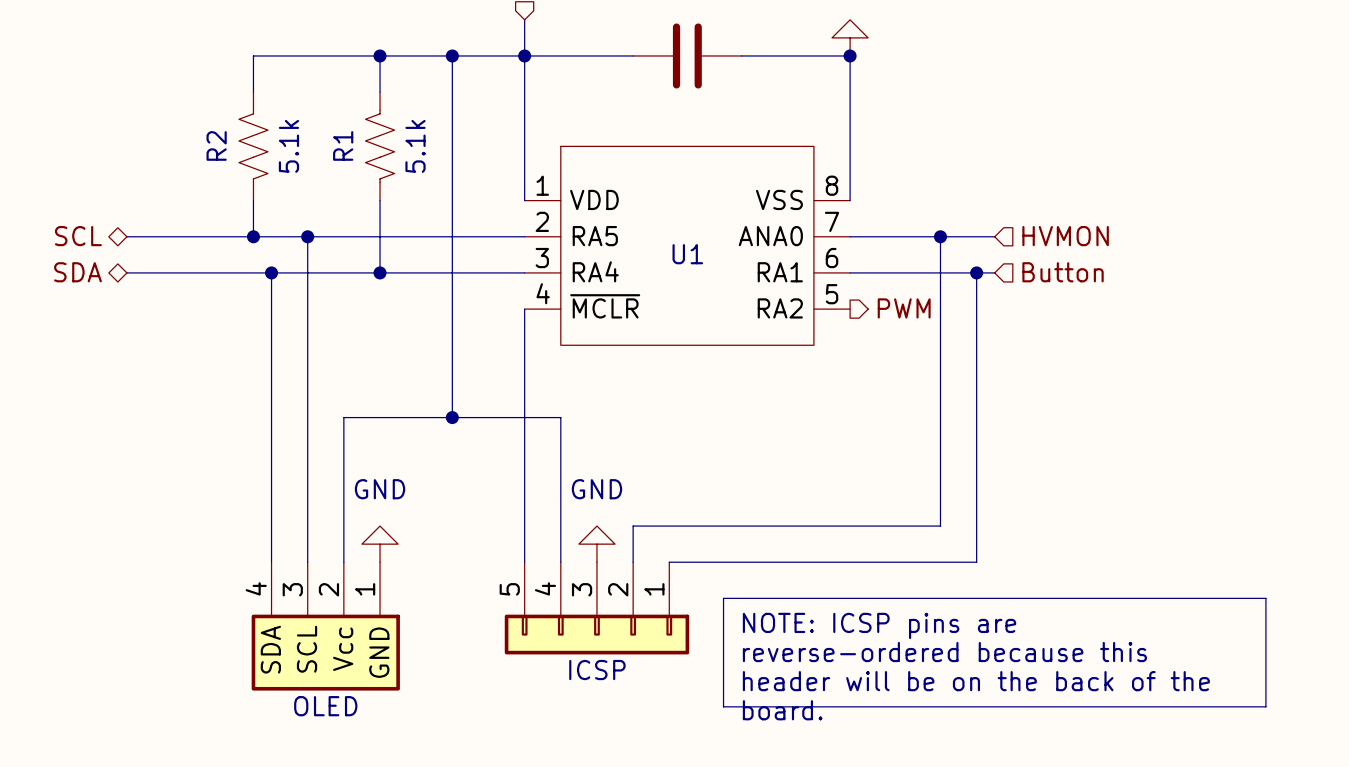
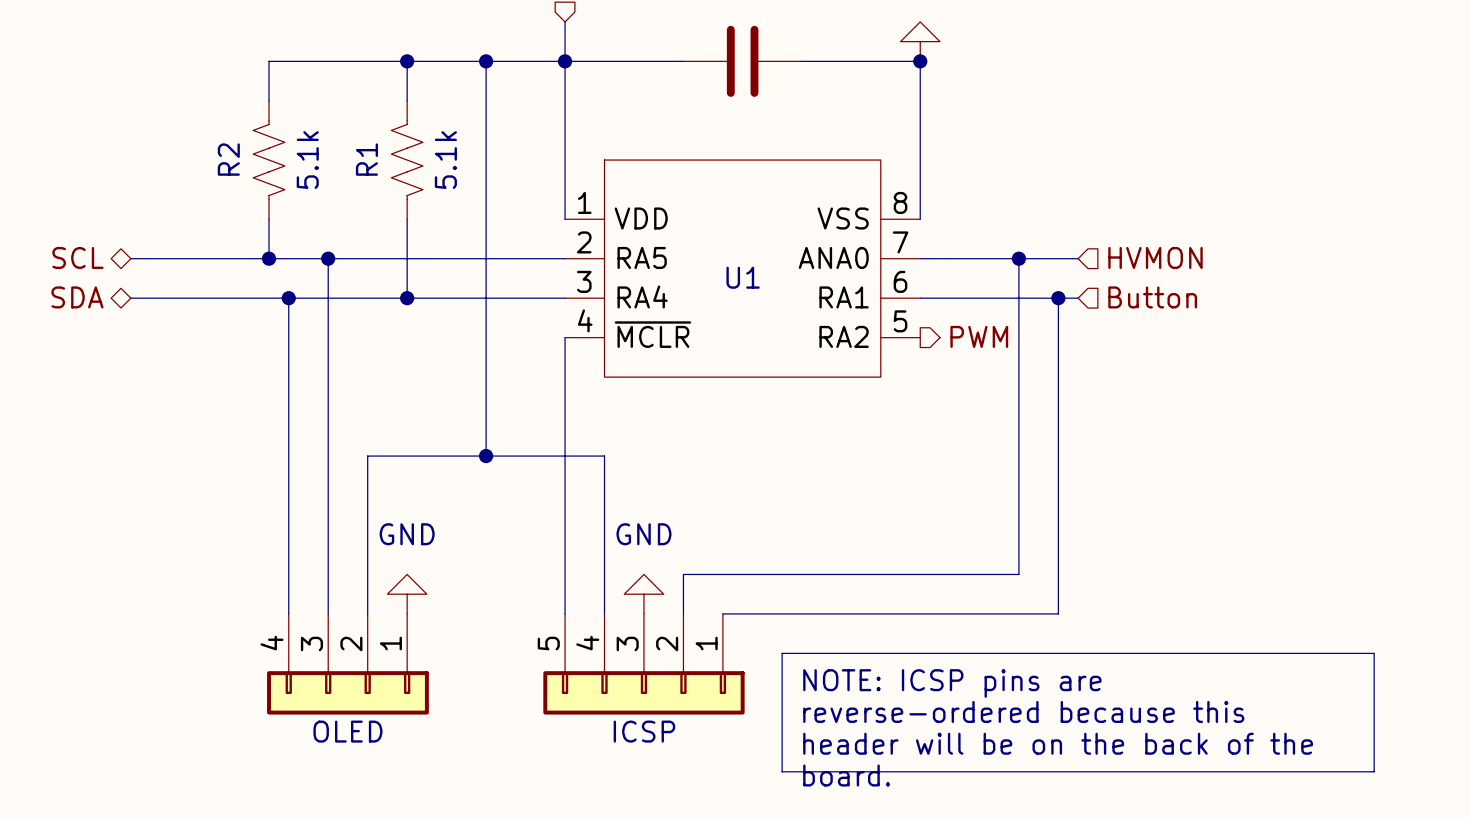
part: none -> OLED (347, 664)
part: OLED (325, 626) -> none

